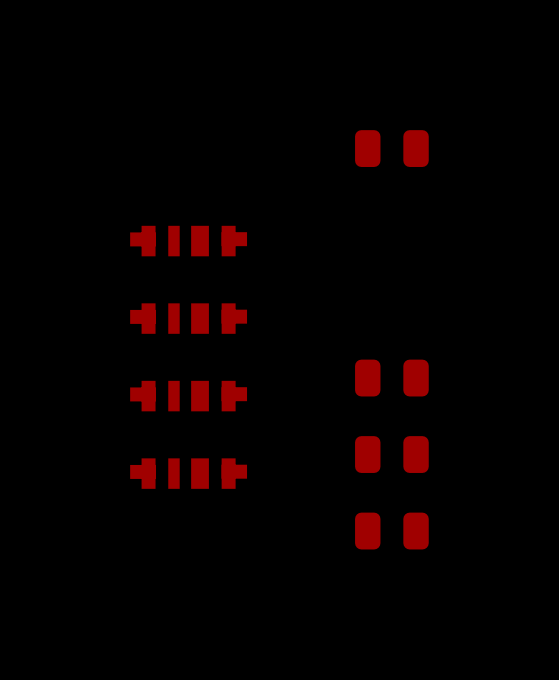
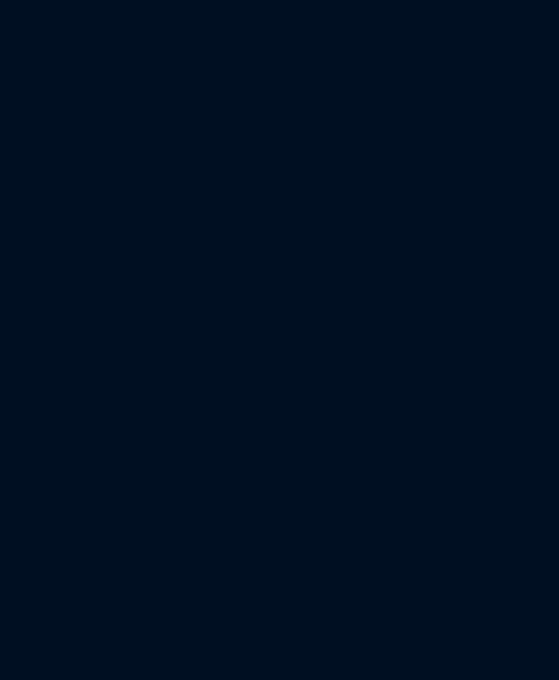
part: (391, 148) -> none
part: (188, 241) -> none
part: (188, 318) -> none
part: (391, 378) -> none
part: (188, 396) -> none
part: (391, 454) -> none
part: (188, 473) -> none
part: (391, 531) -> none

